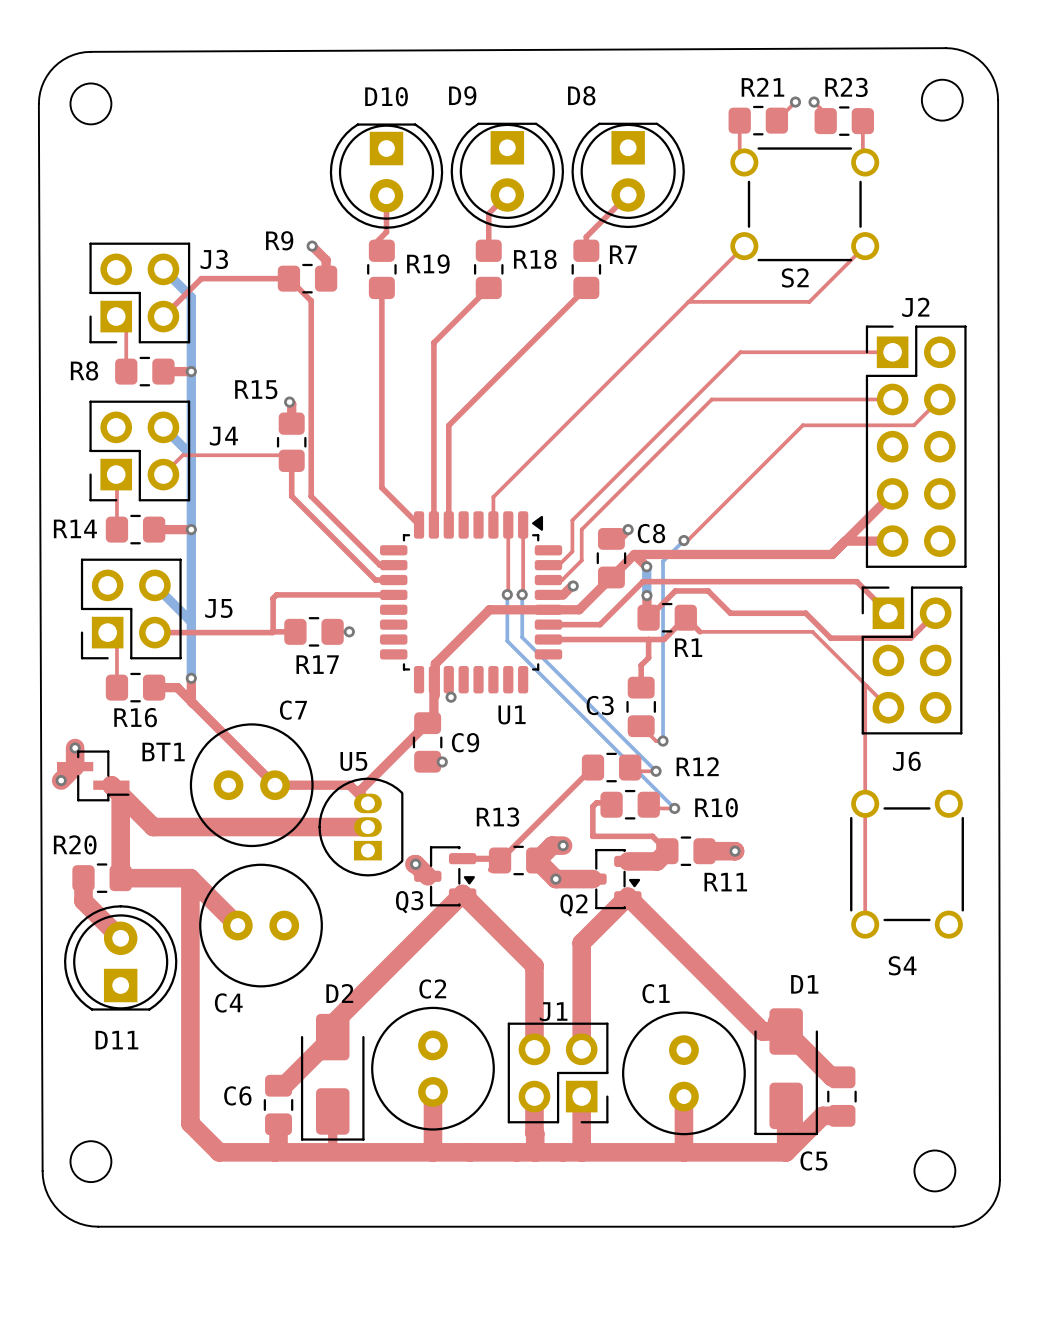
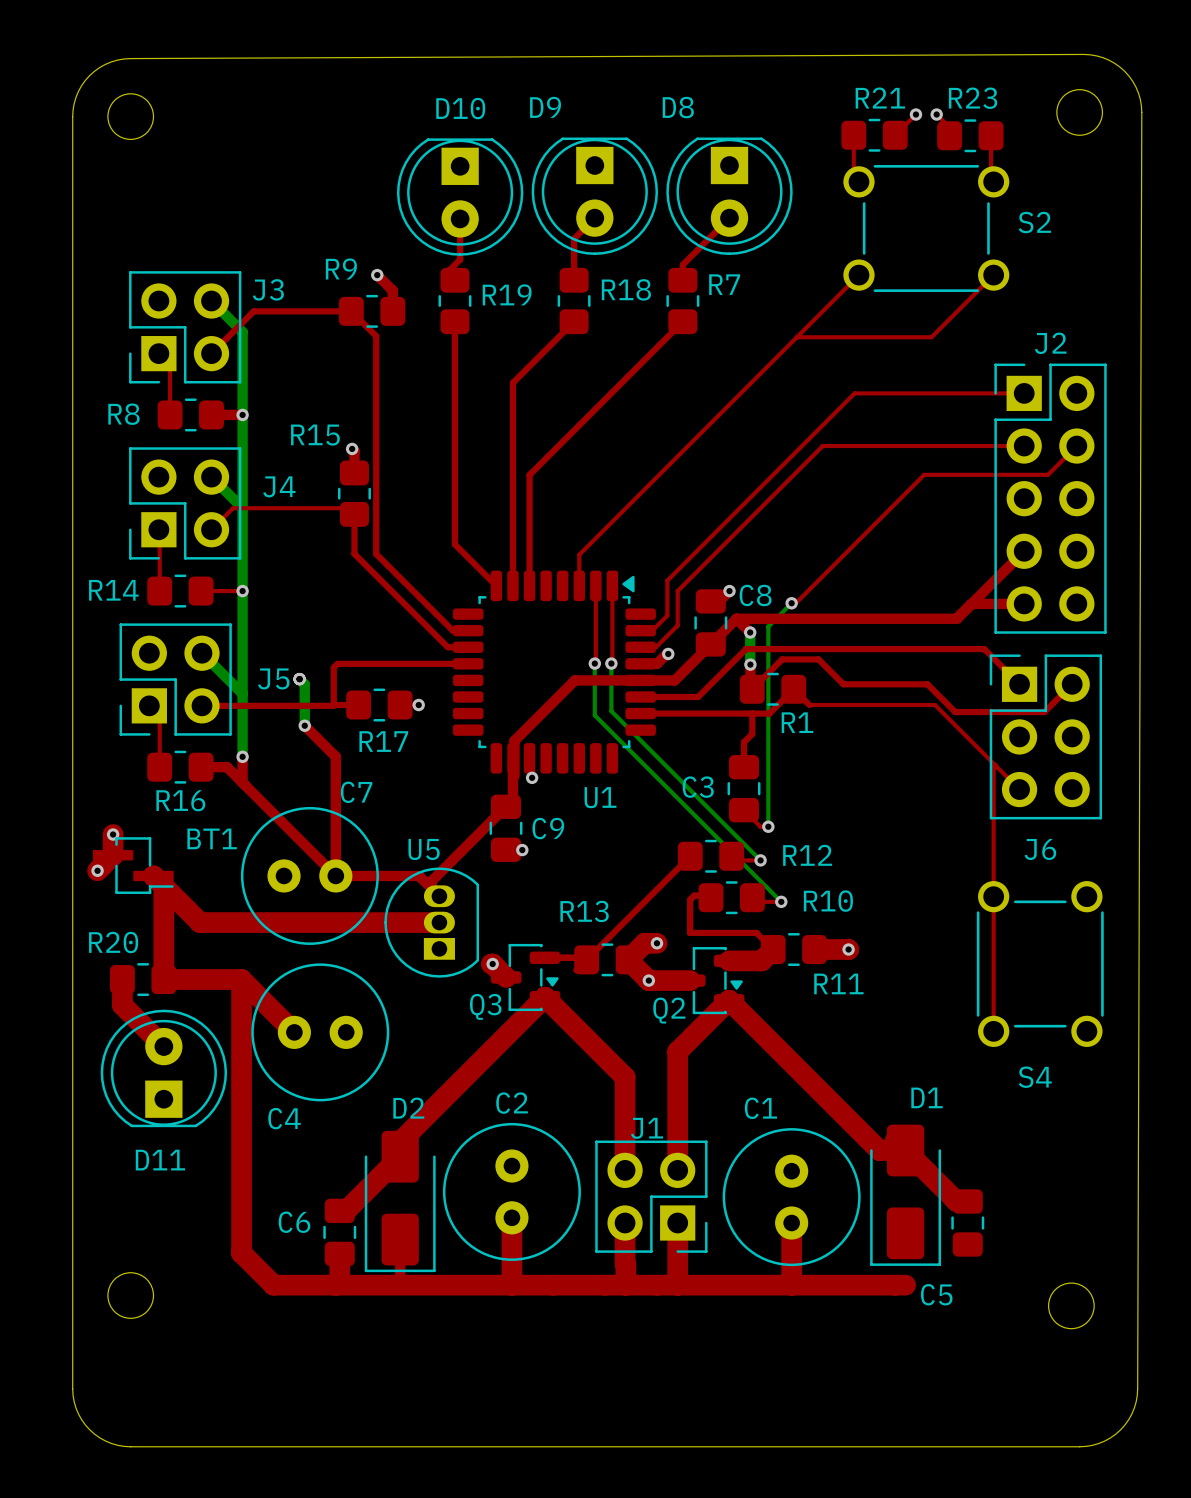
board edge: (998, 100) (999, 1180) (997, 1195) (986, 1213) (968, 1224) (953, 1226) (98, 1226) (74, 1221) (54, 1205) (45, 1189) (42, 1170) (38, 103) -> (1141, 112) (1137, 1388) (1134, 1407) (1120, 1429) (1104, 1441) (1079, 1446) (130, 1446) (105, 1441) (85, 1424) (75, 1407) (72, 1388) (72, 116)
S2 name position: S2 (795, 277) -> S2 (1034, 222)
top track width: thick (154, 529) (191, 529) -> thin (201, 591) (242, 591)
bottom track: none -> (299, 679) (304, 684) (304, 725)
via: none -> (299, 679)
top track: none -> (304, 725) (335, 756) (335, 875)
via: none -> (304, 725)
top track: (786, 1105) (786, 1152) (822, 1115) (841, 1115) -> none

